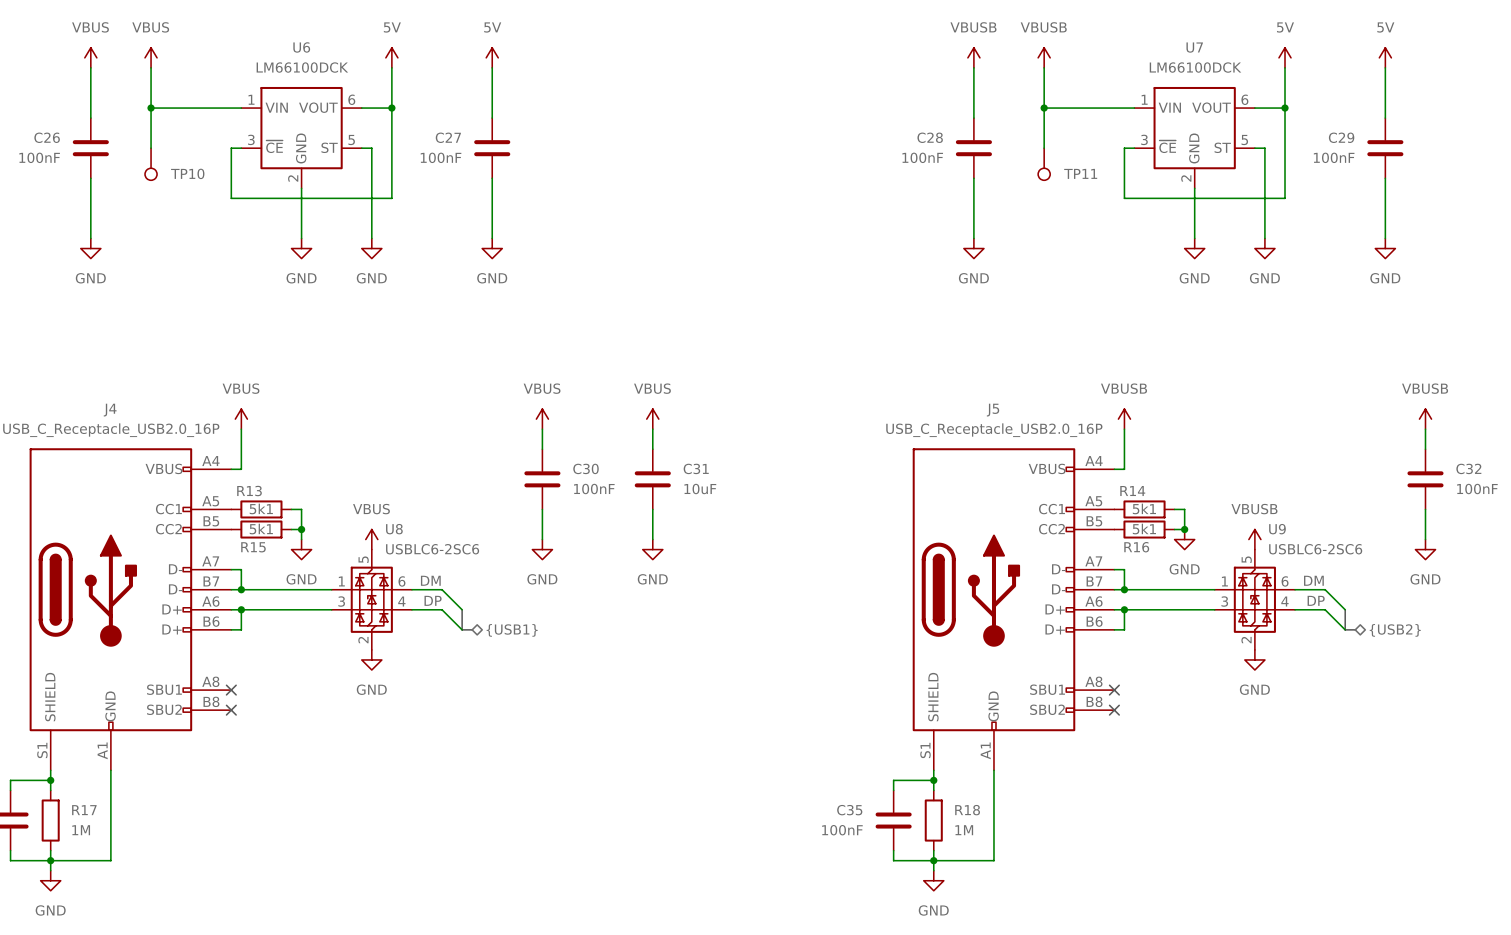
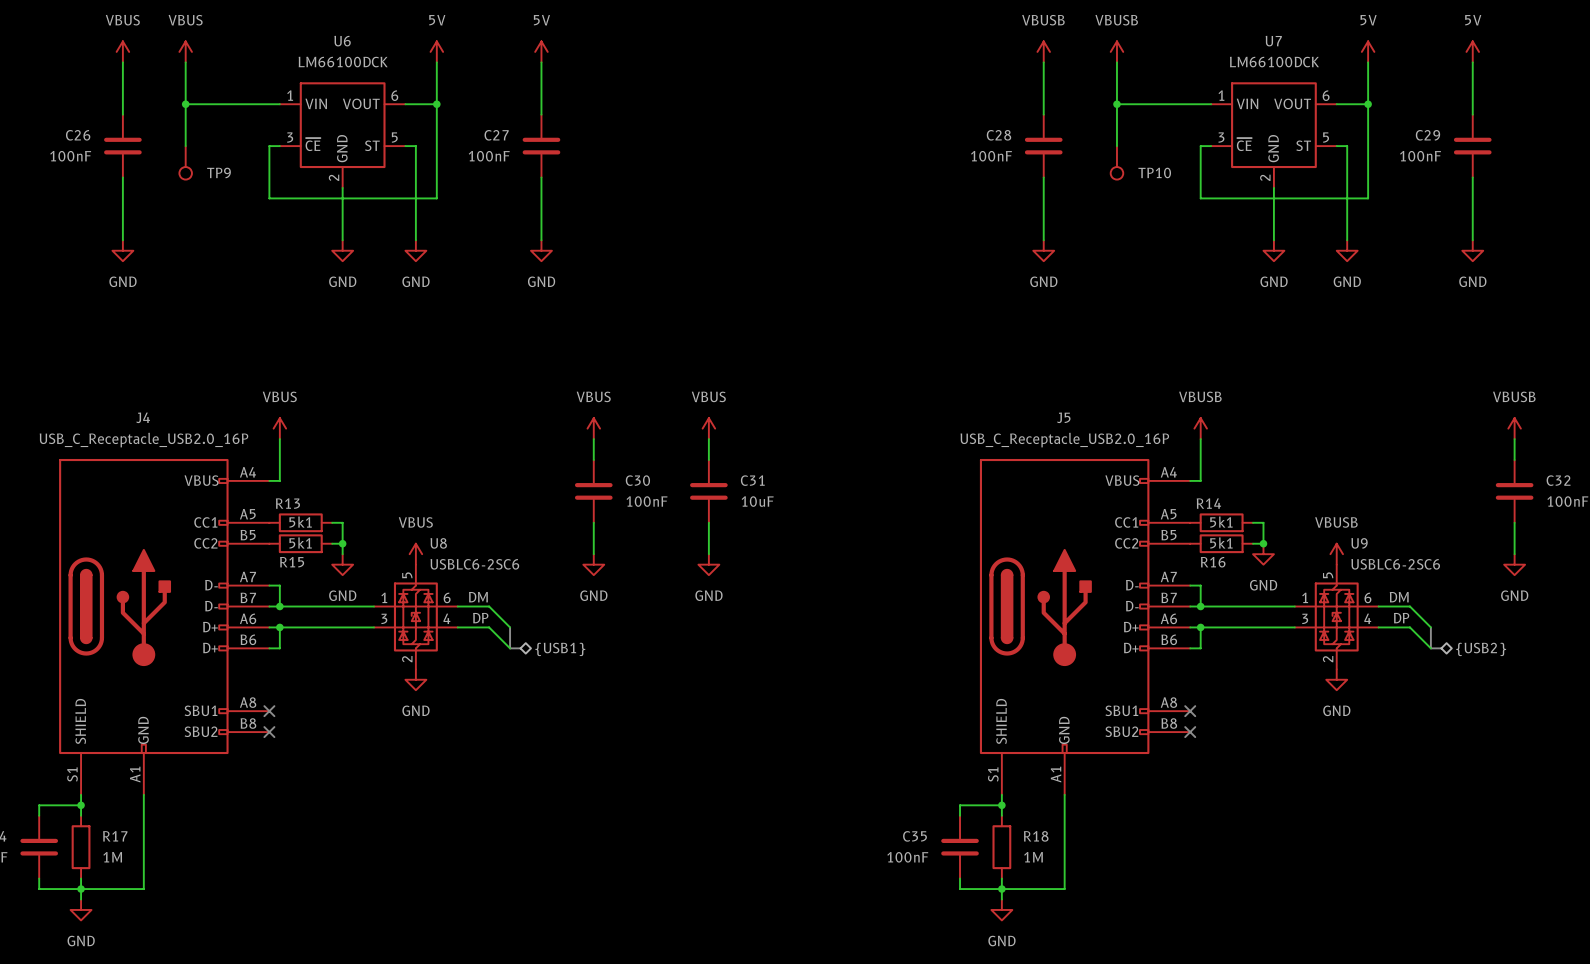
TP10 name: TP10 (187, 173) -> TP9 (219, 172)
TP11 name: TP11 (1080, 173) -> TP10 (1154, 172)

